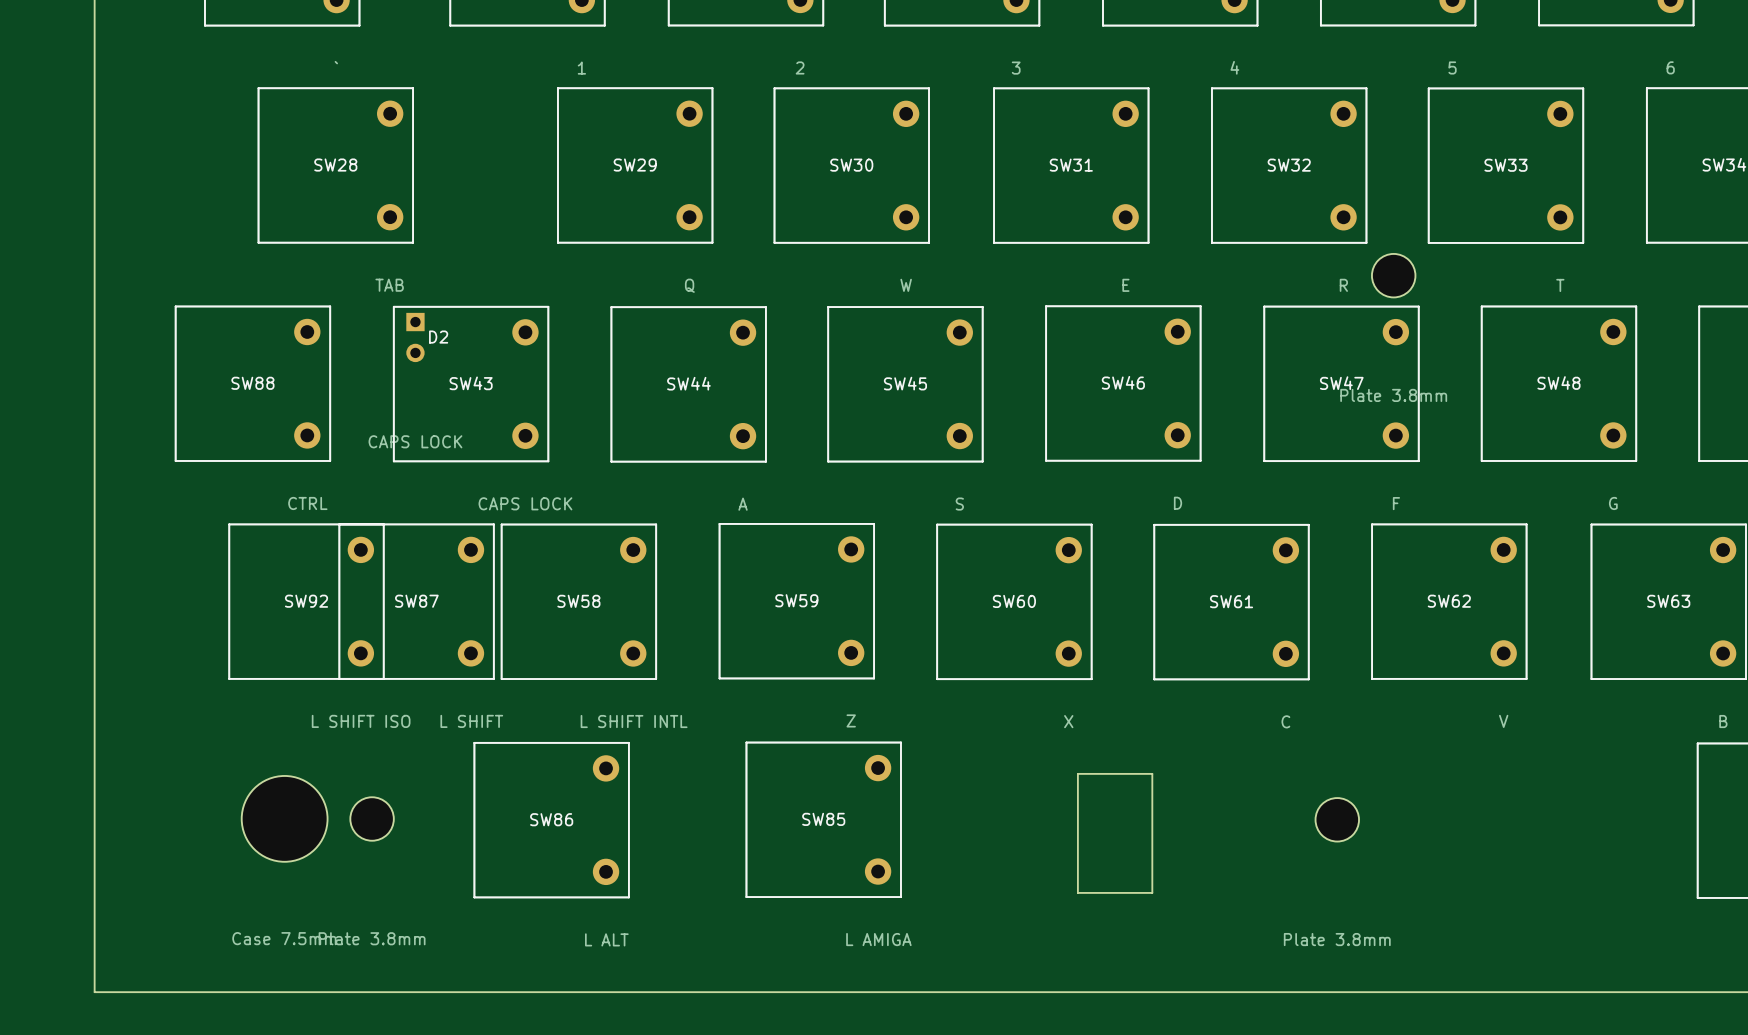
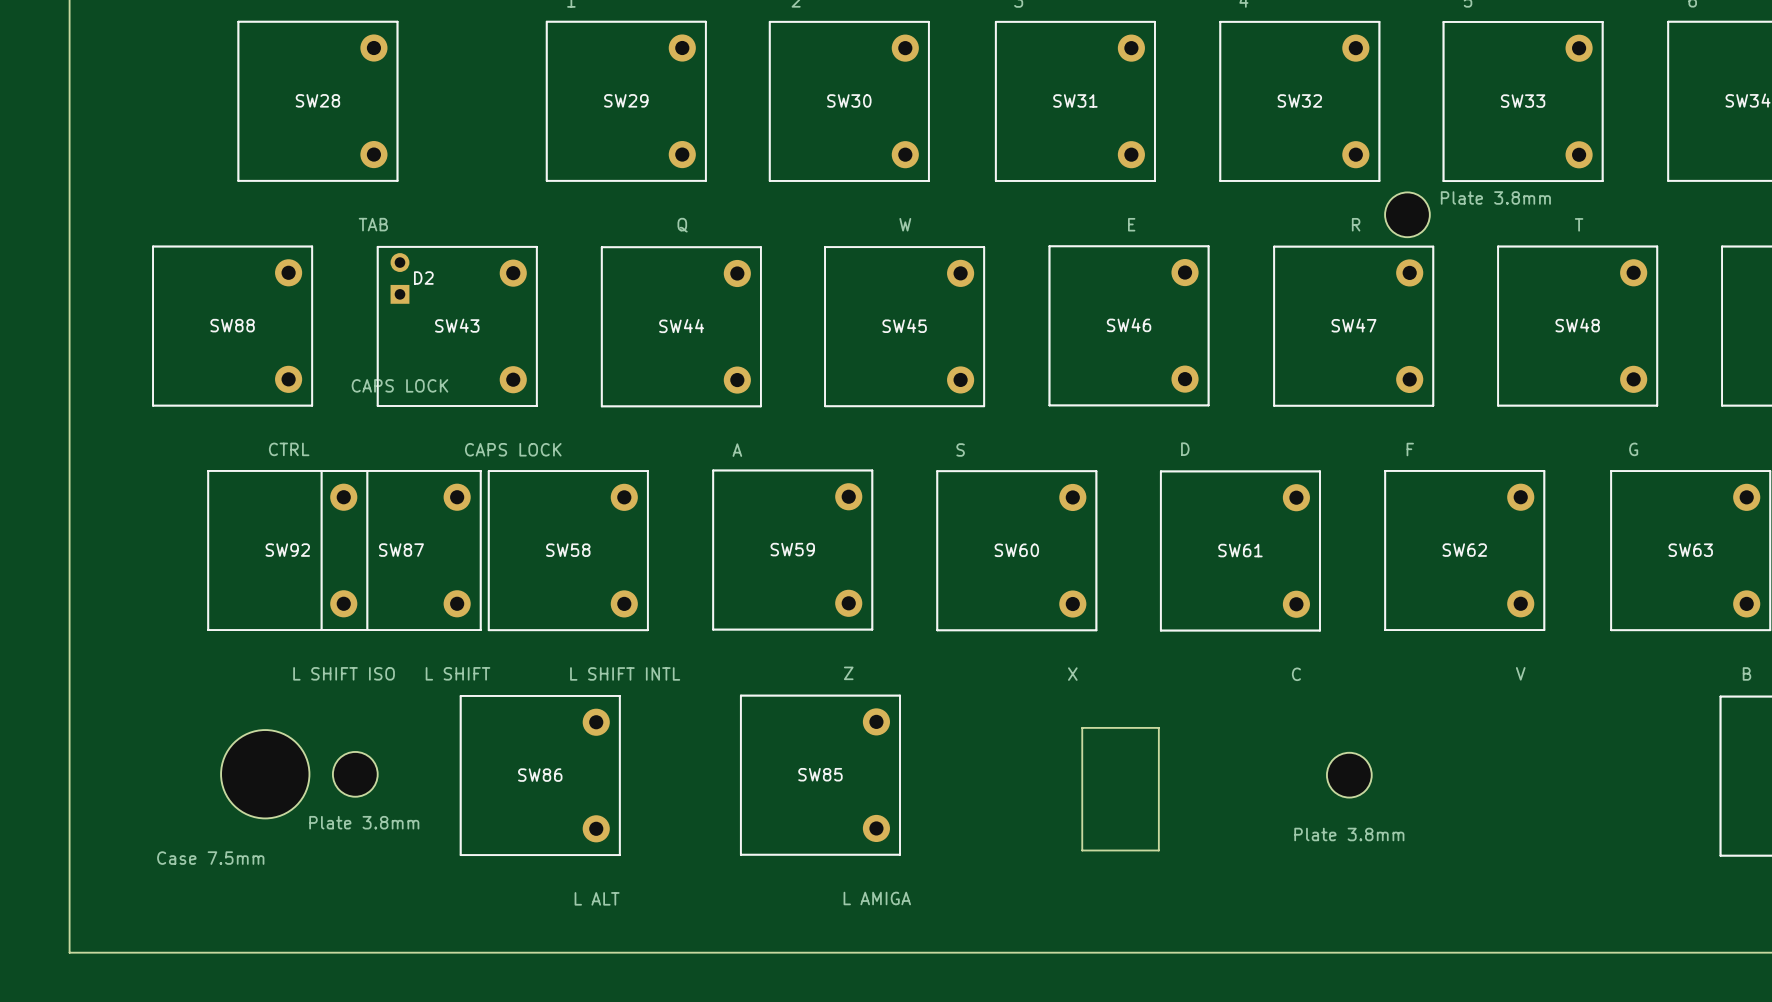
D2 rotation: 0° (415, 337) -> 180° (399, 278)
part value position: Plate 3.8mm (1393, 395) -> Plate 3.8mm (1495, 197)
part value position: Case 7.5mm (284, 938) -> Case 7.5mm (210, 858)
part value position: Plate 3.8mm (372, 938) -> Plate 3.8mm (364, 822)
part value position: Plate 3.8mm (1337, 939) -> Plate 3.8mm (1349, 834)

